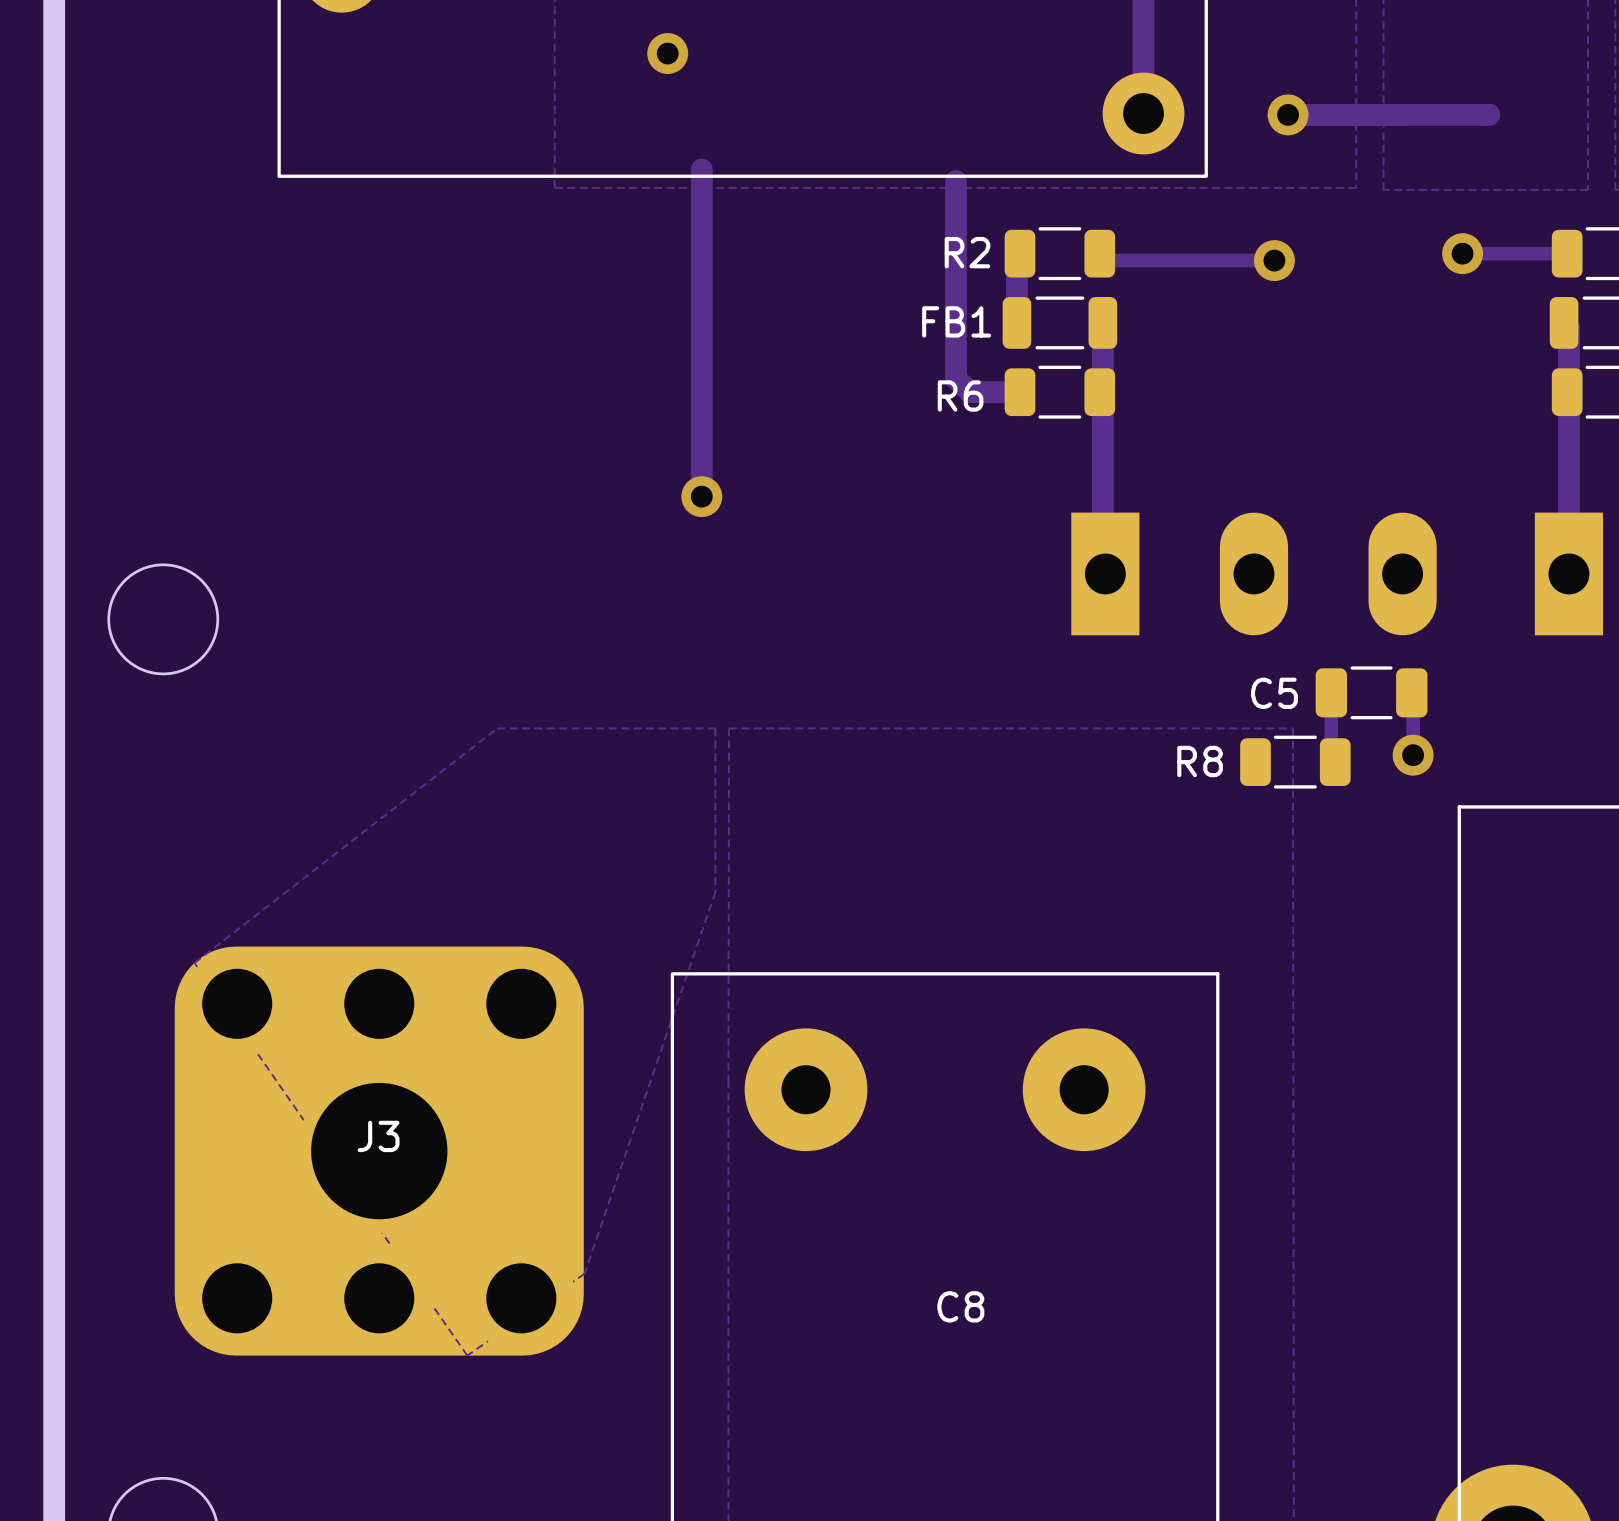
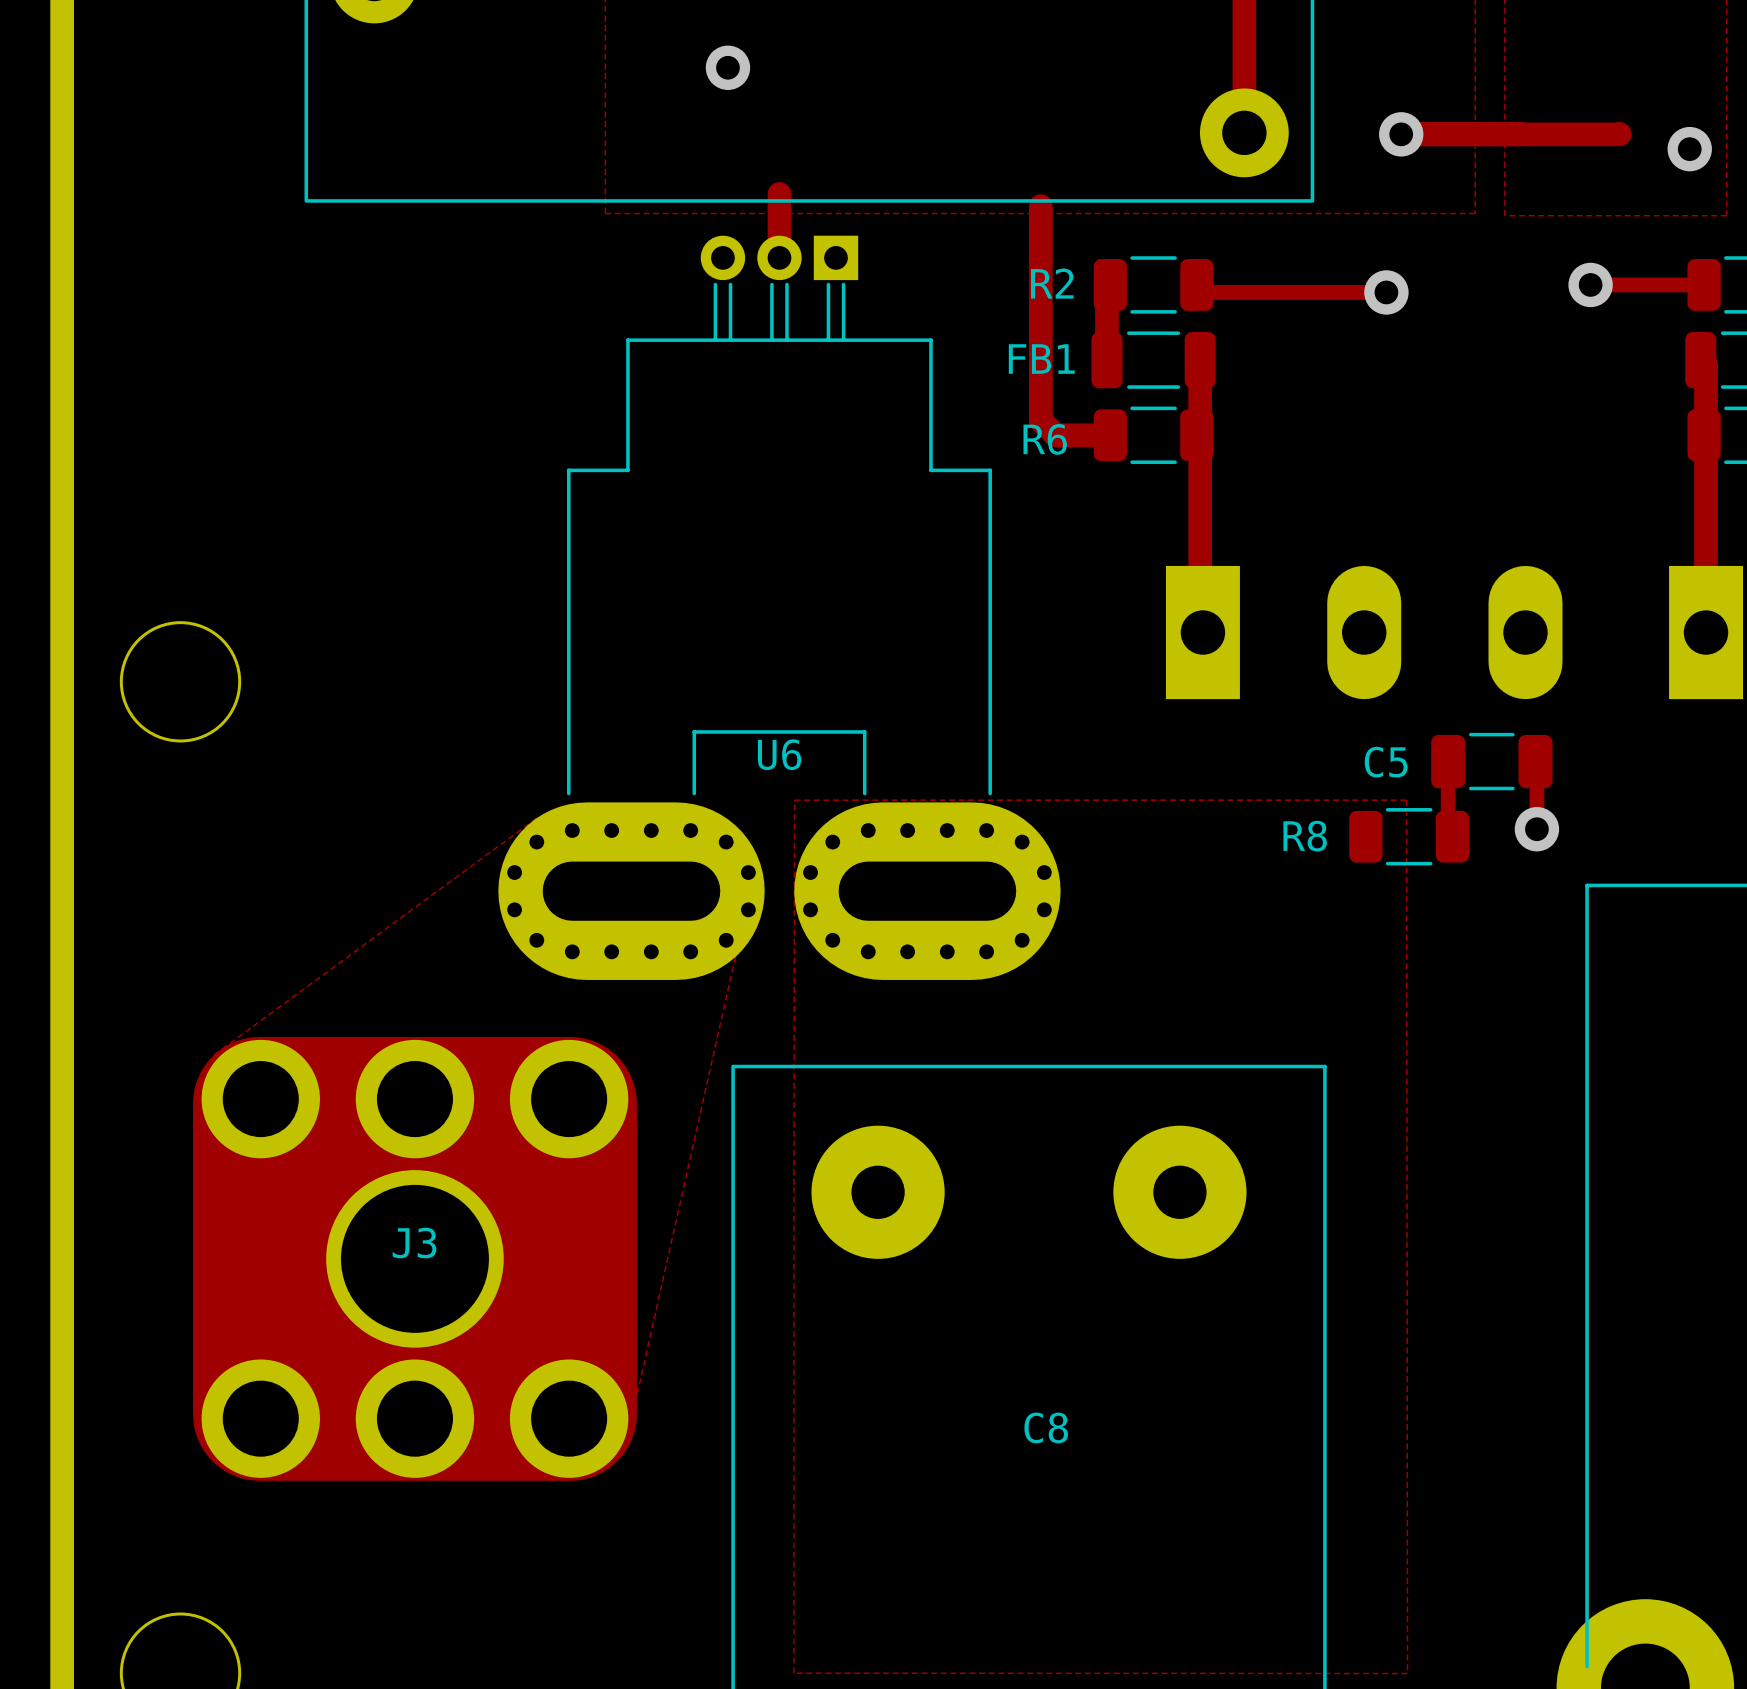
via: none -> (1689, 149)
track: (701, 169) (701, 496) -> none
track: none -> (779, 193) (779, 257)
via: (701, 496) -> none
U6: none -> (779, 607)
zone outline: (194, 962) (497, 728) (715, 728) (715, 892) (584, 1273) -> (214, 1054) (537, 817) (705, 933) (735, 957) (637, 1392)

